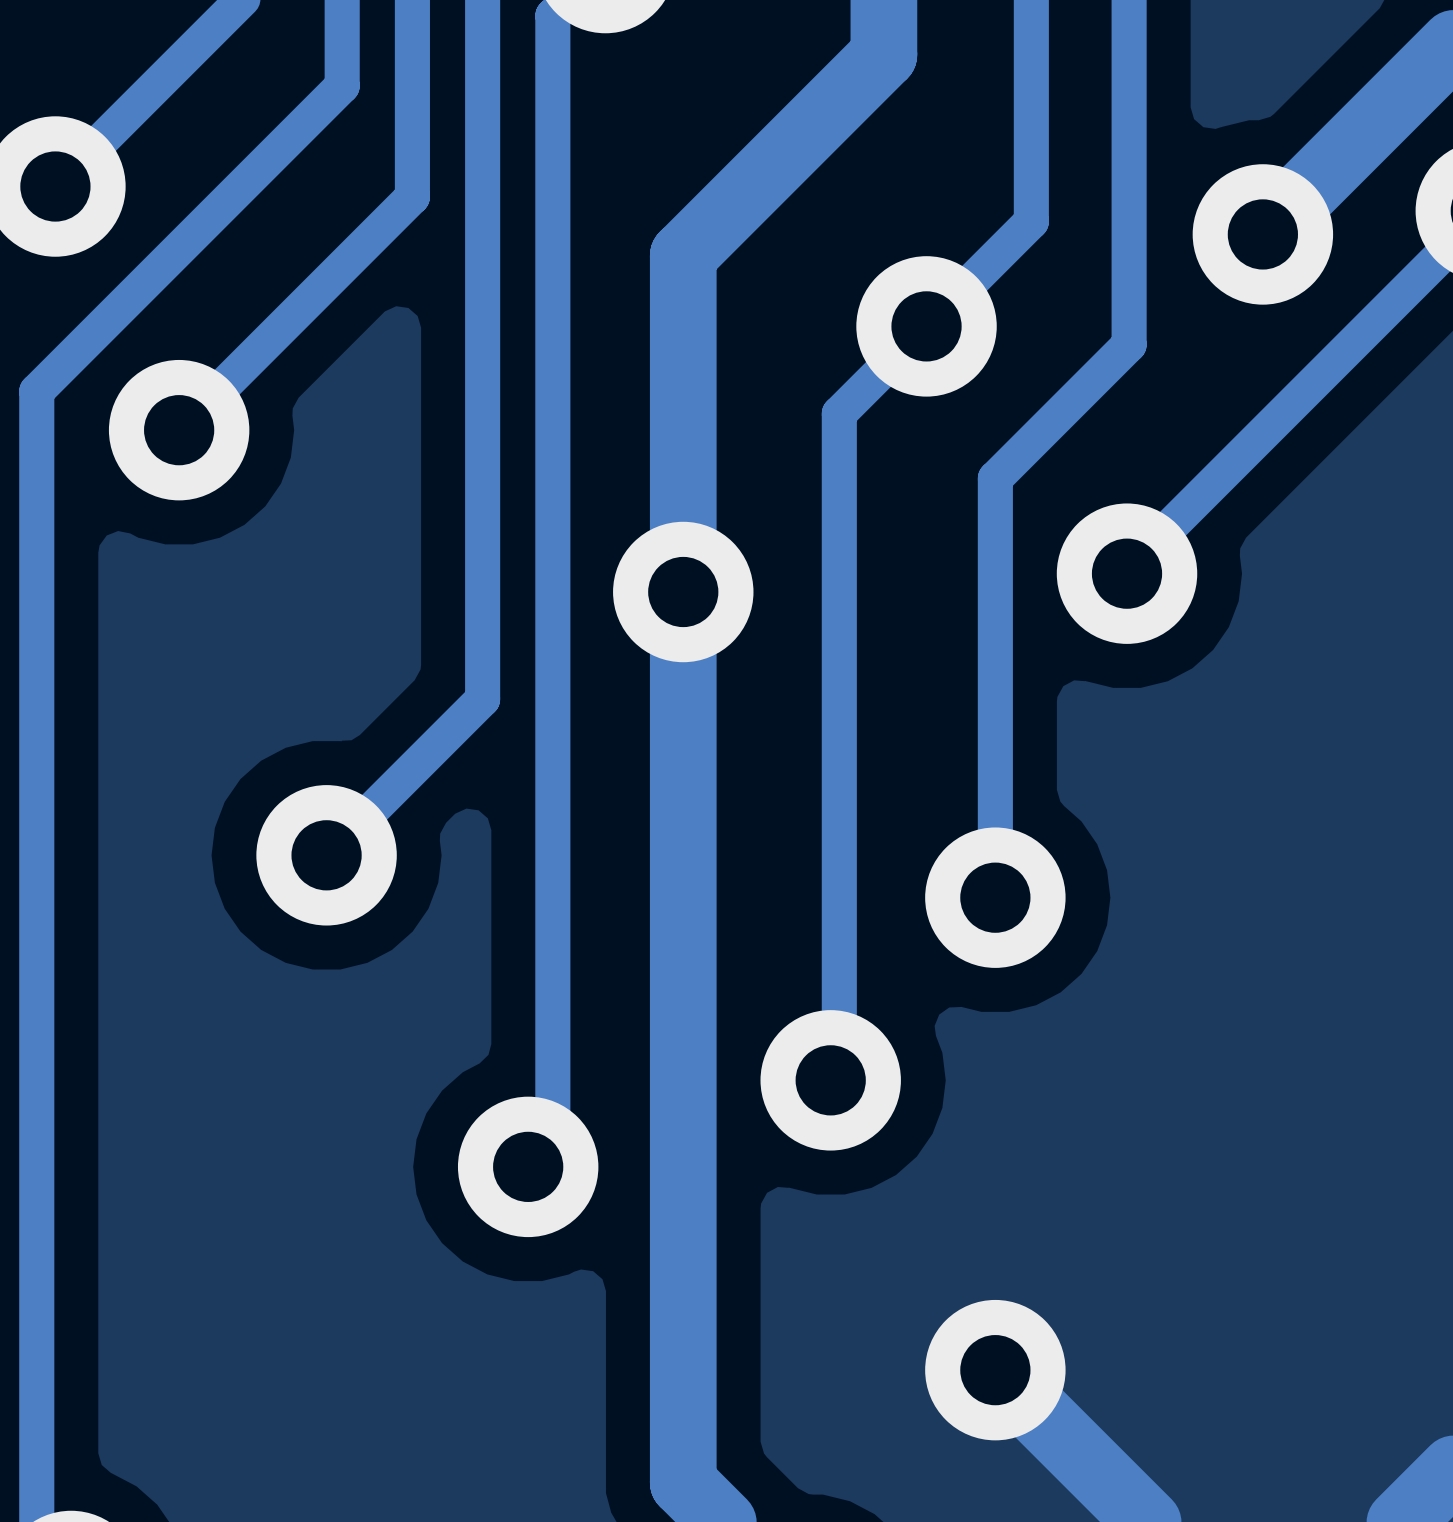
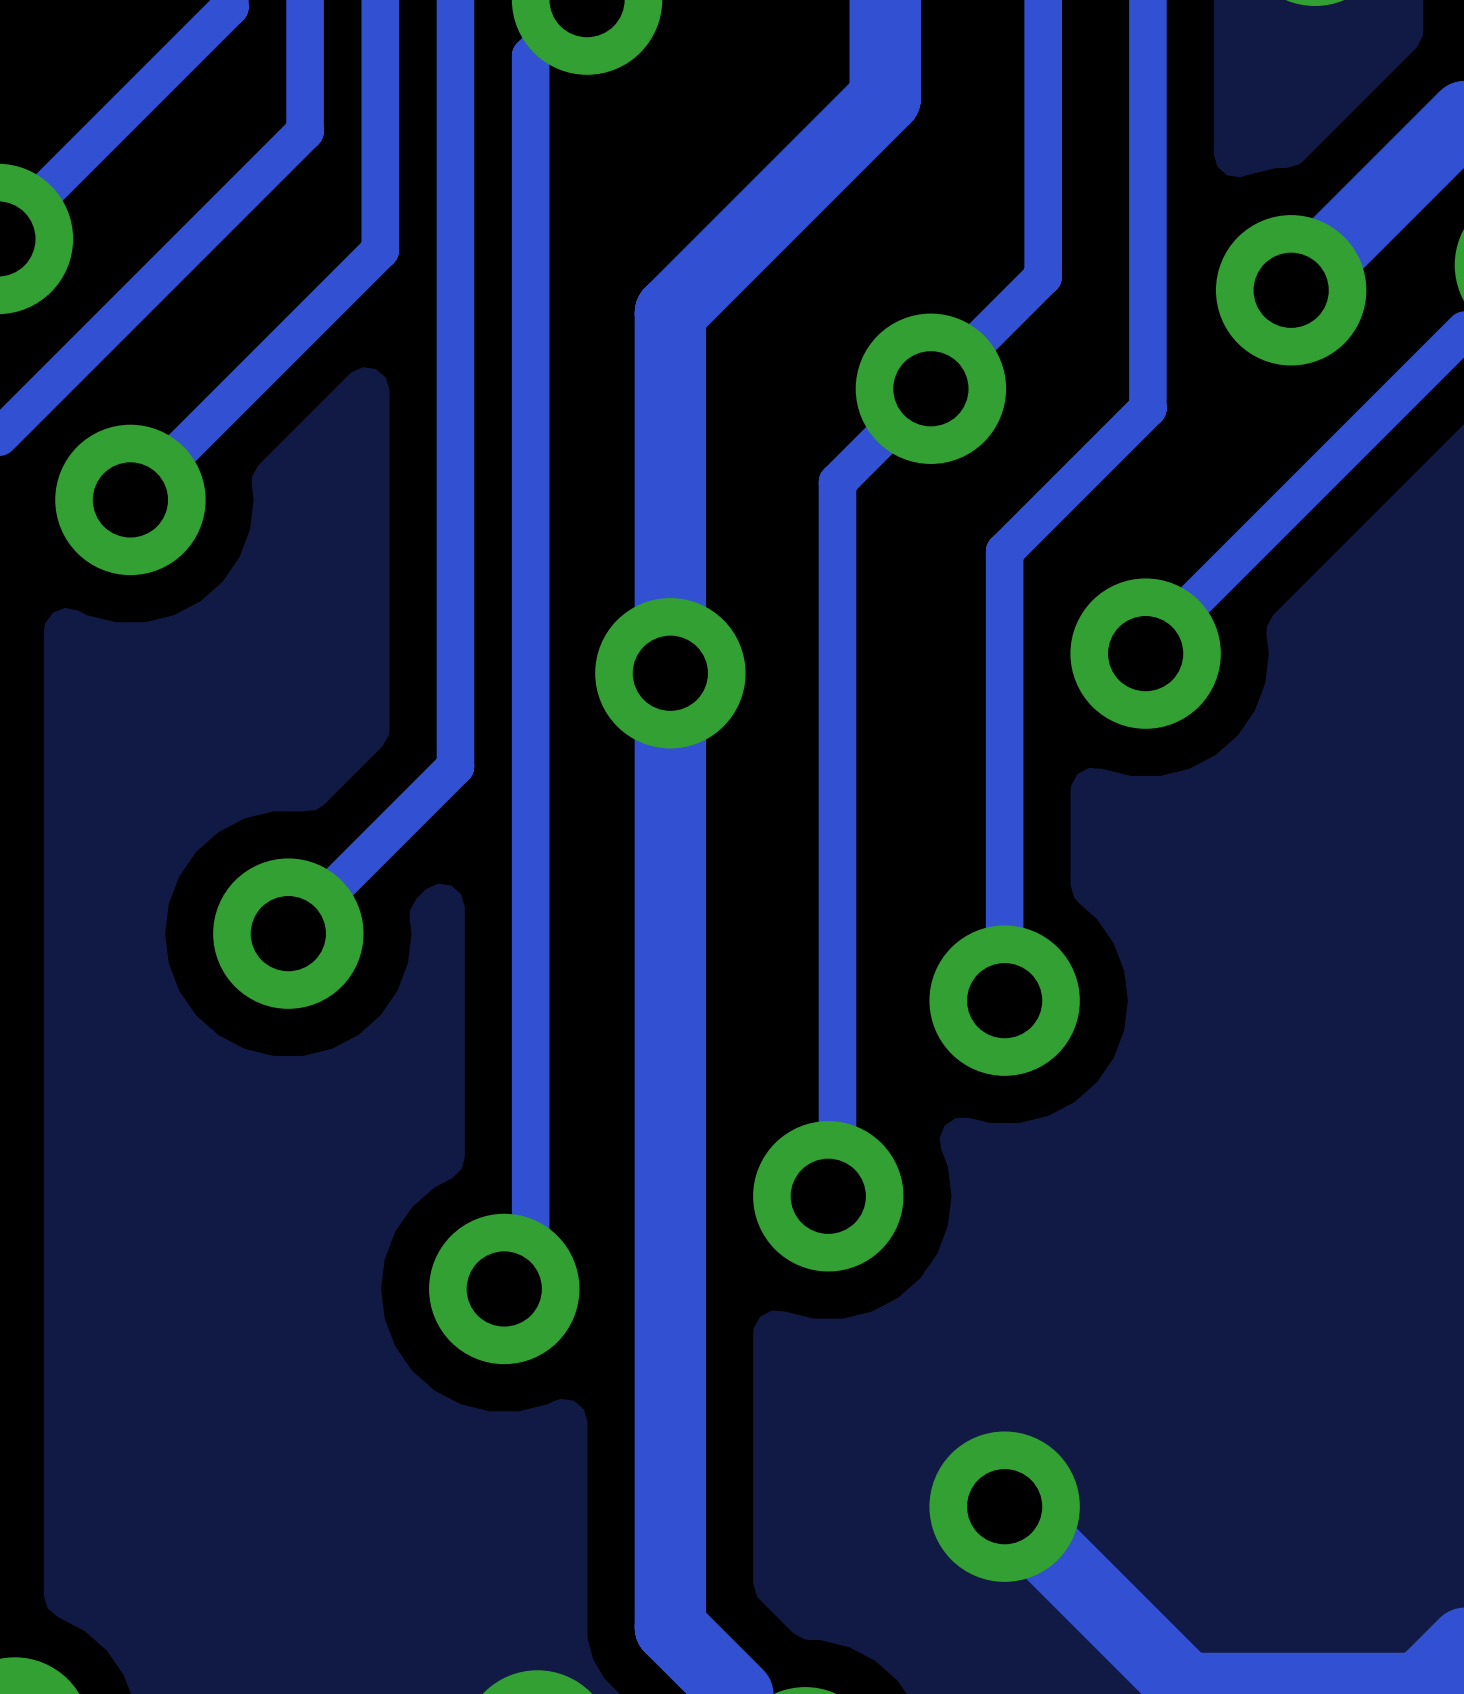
track: (482, 679) (482, 699) (326, 855) -> (455, 766) (288, 933)
via position: (326, 855) -> (288, 933)

